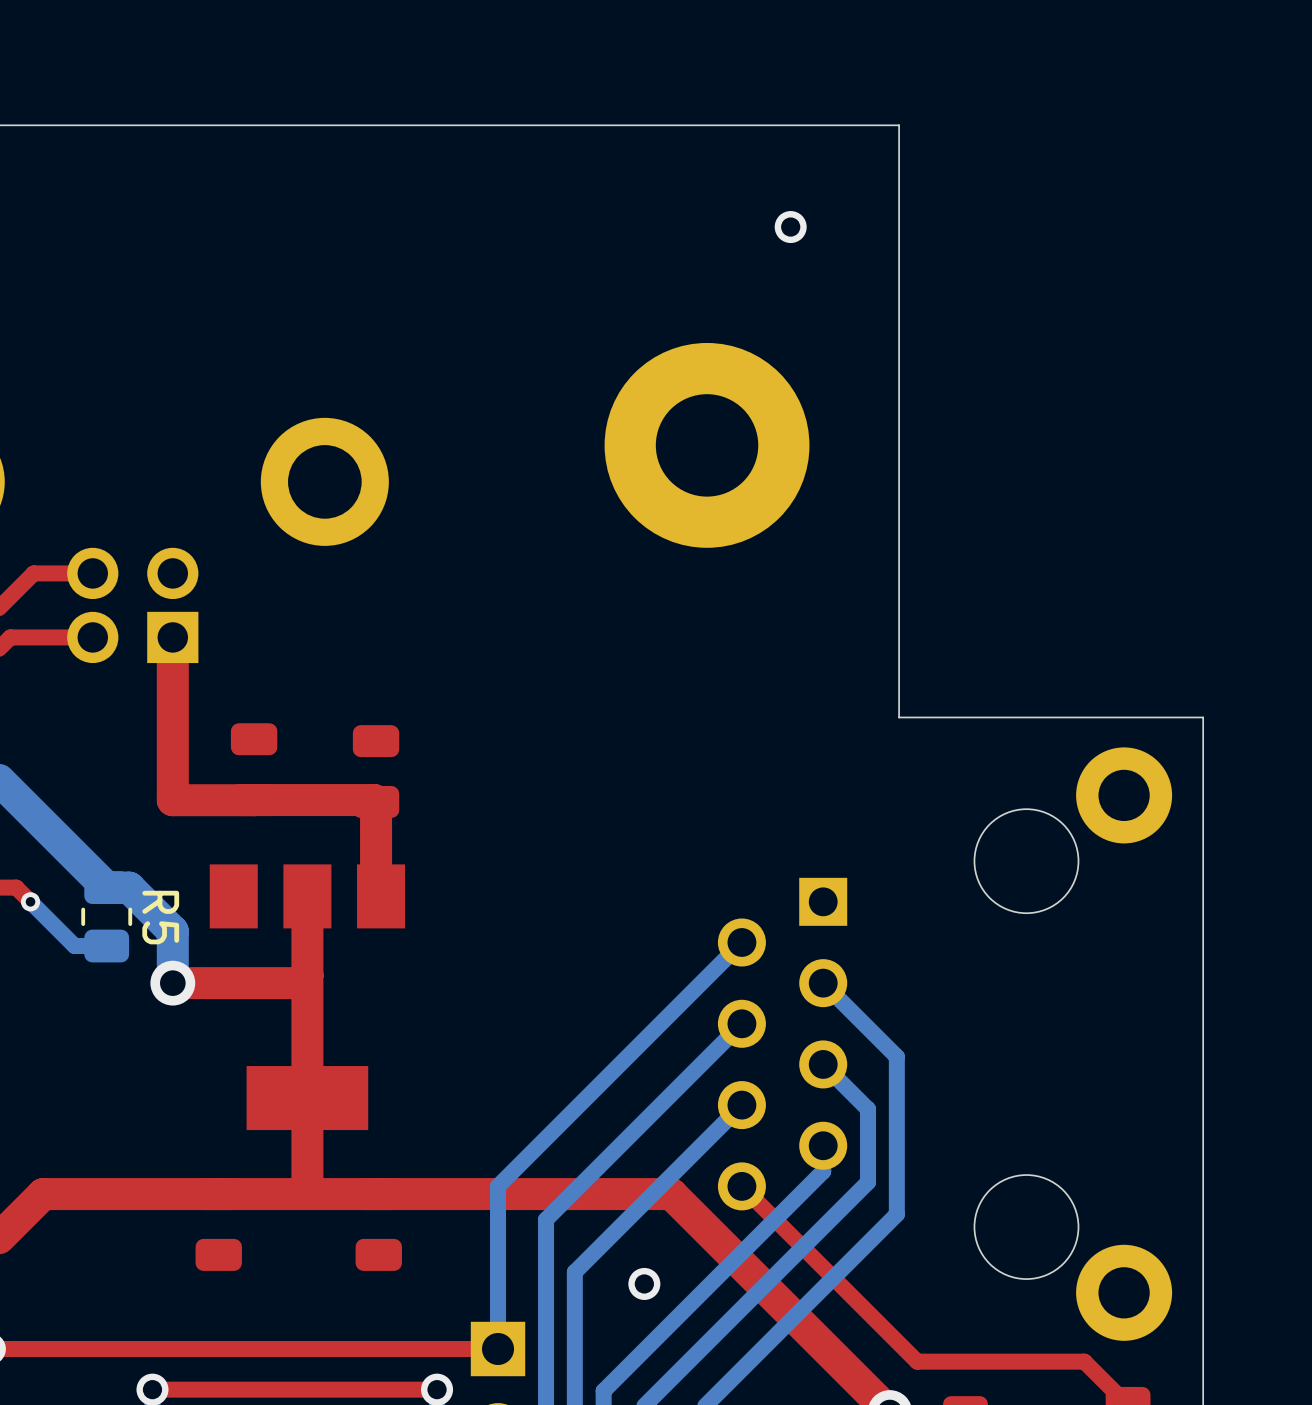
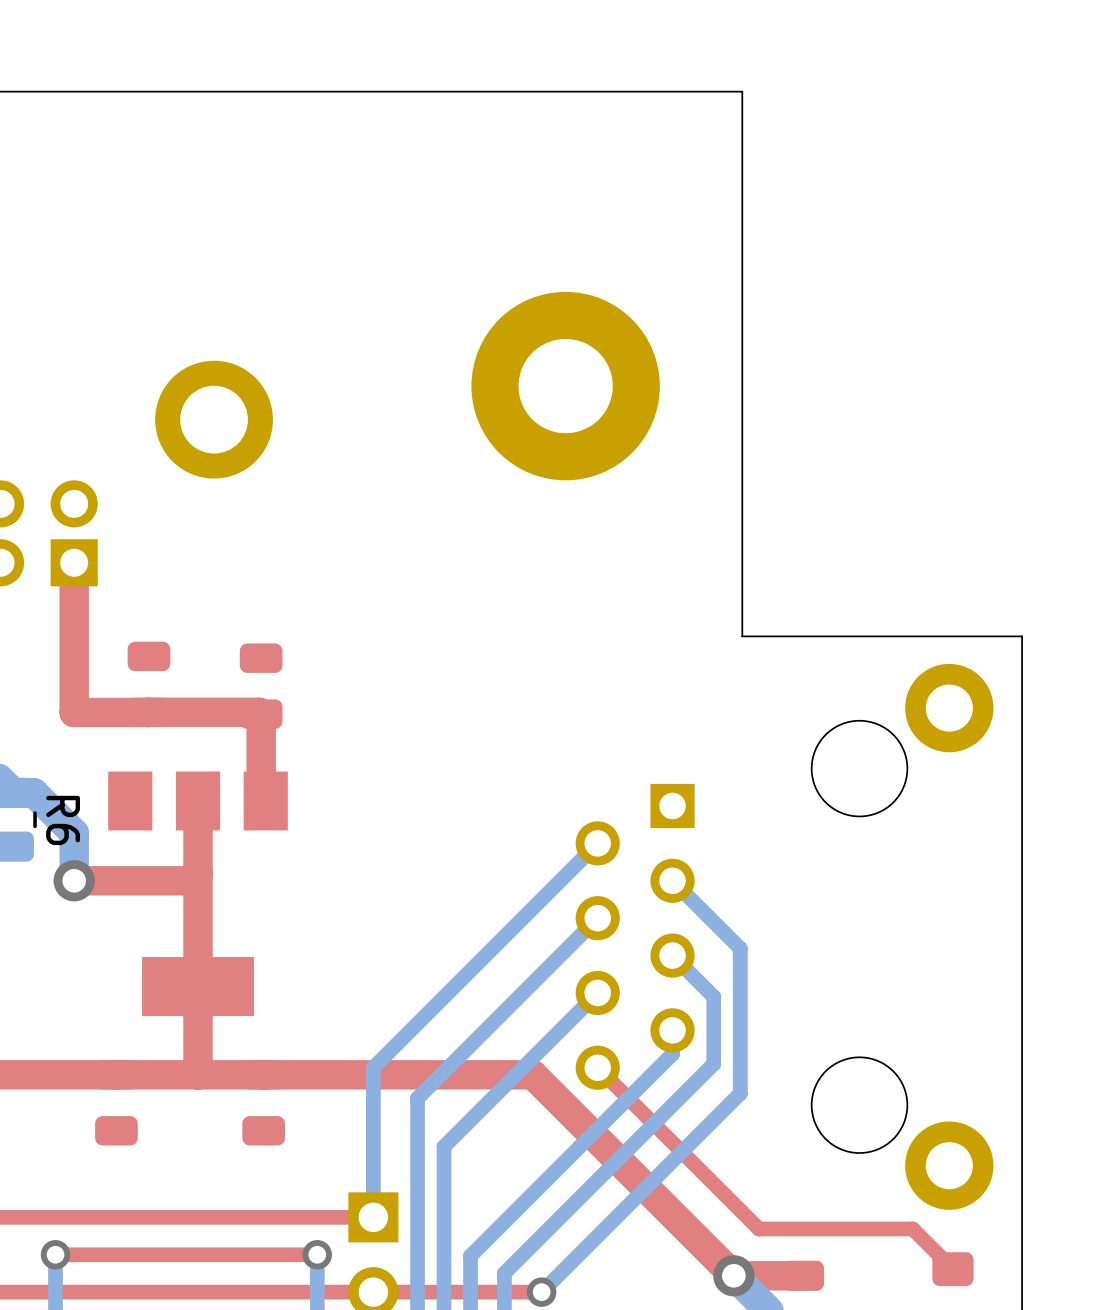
via: (790, 227) -> none
R5 name: R5 (160, 917) -> R6 (63, 820)
via: (644, 1283) -> none

